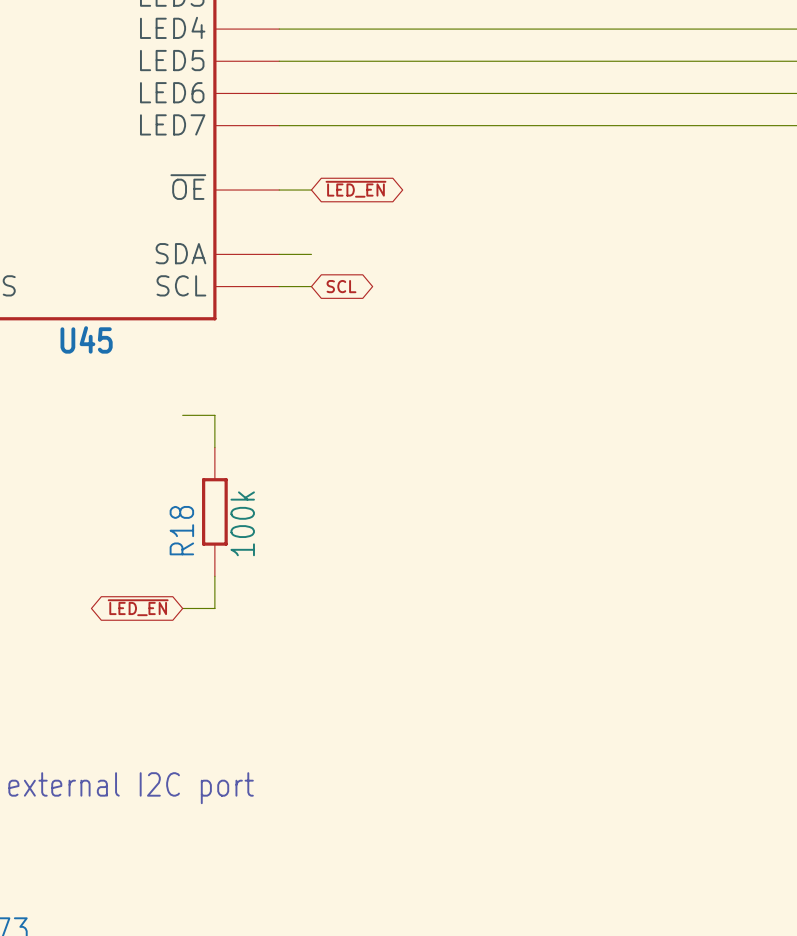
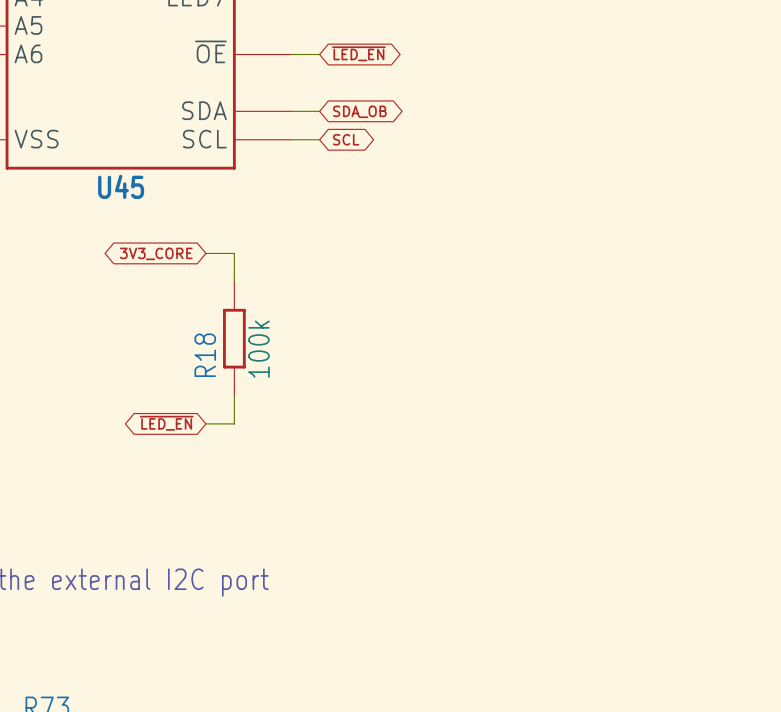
global label: none -> SDA_OB (359, 111)
global label: none -> 3V3_CORE (156, 253)

